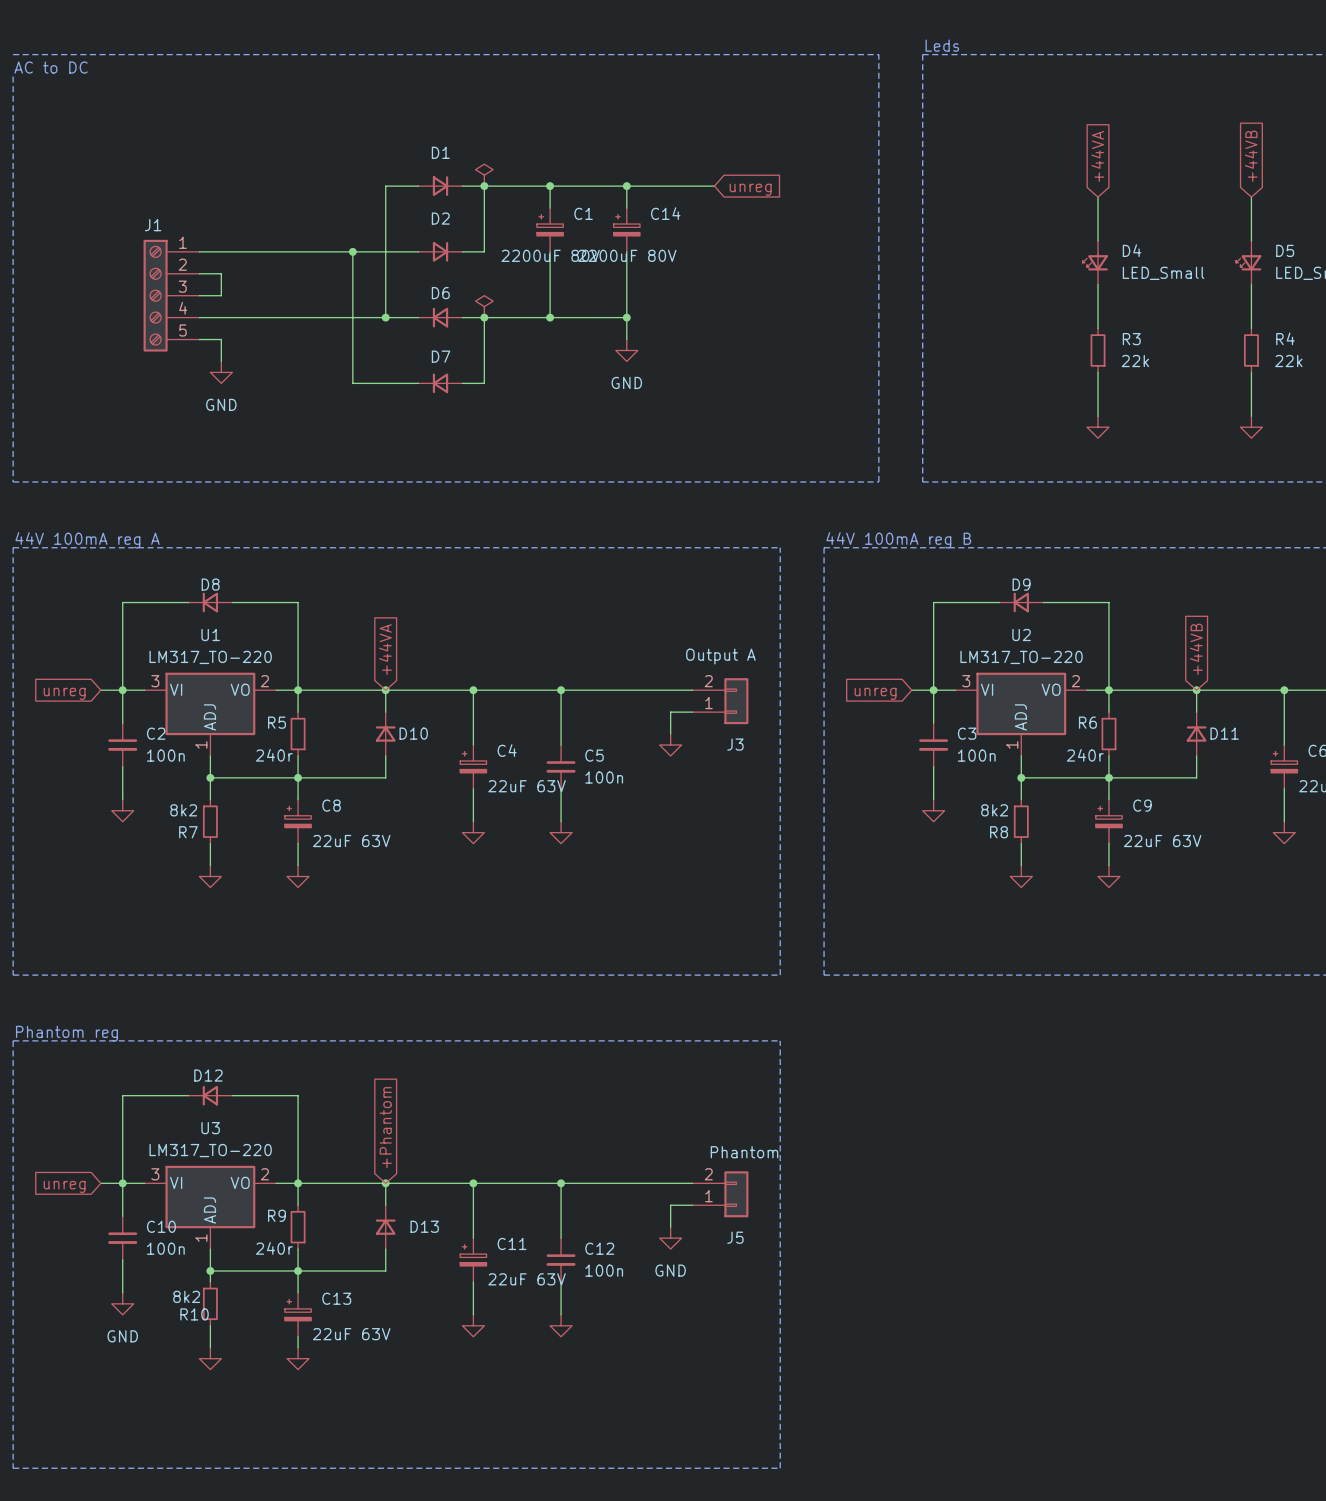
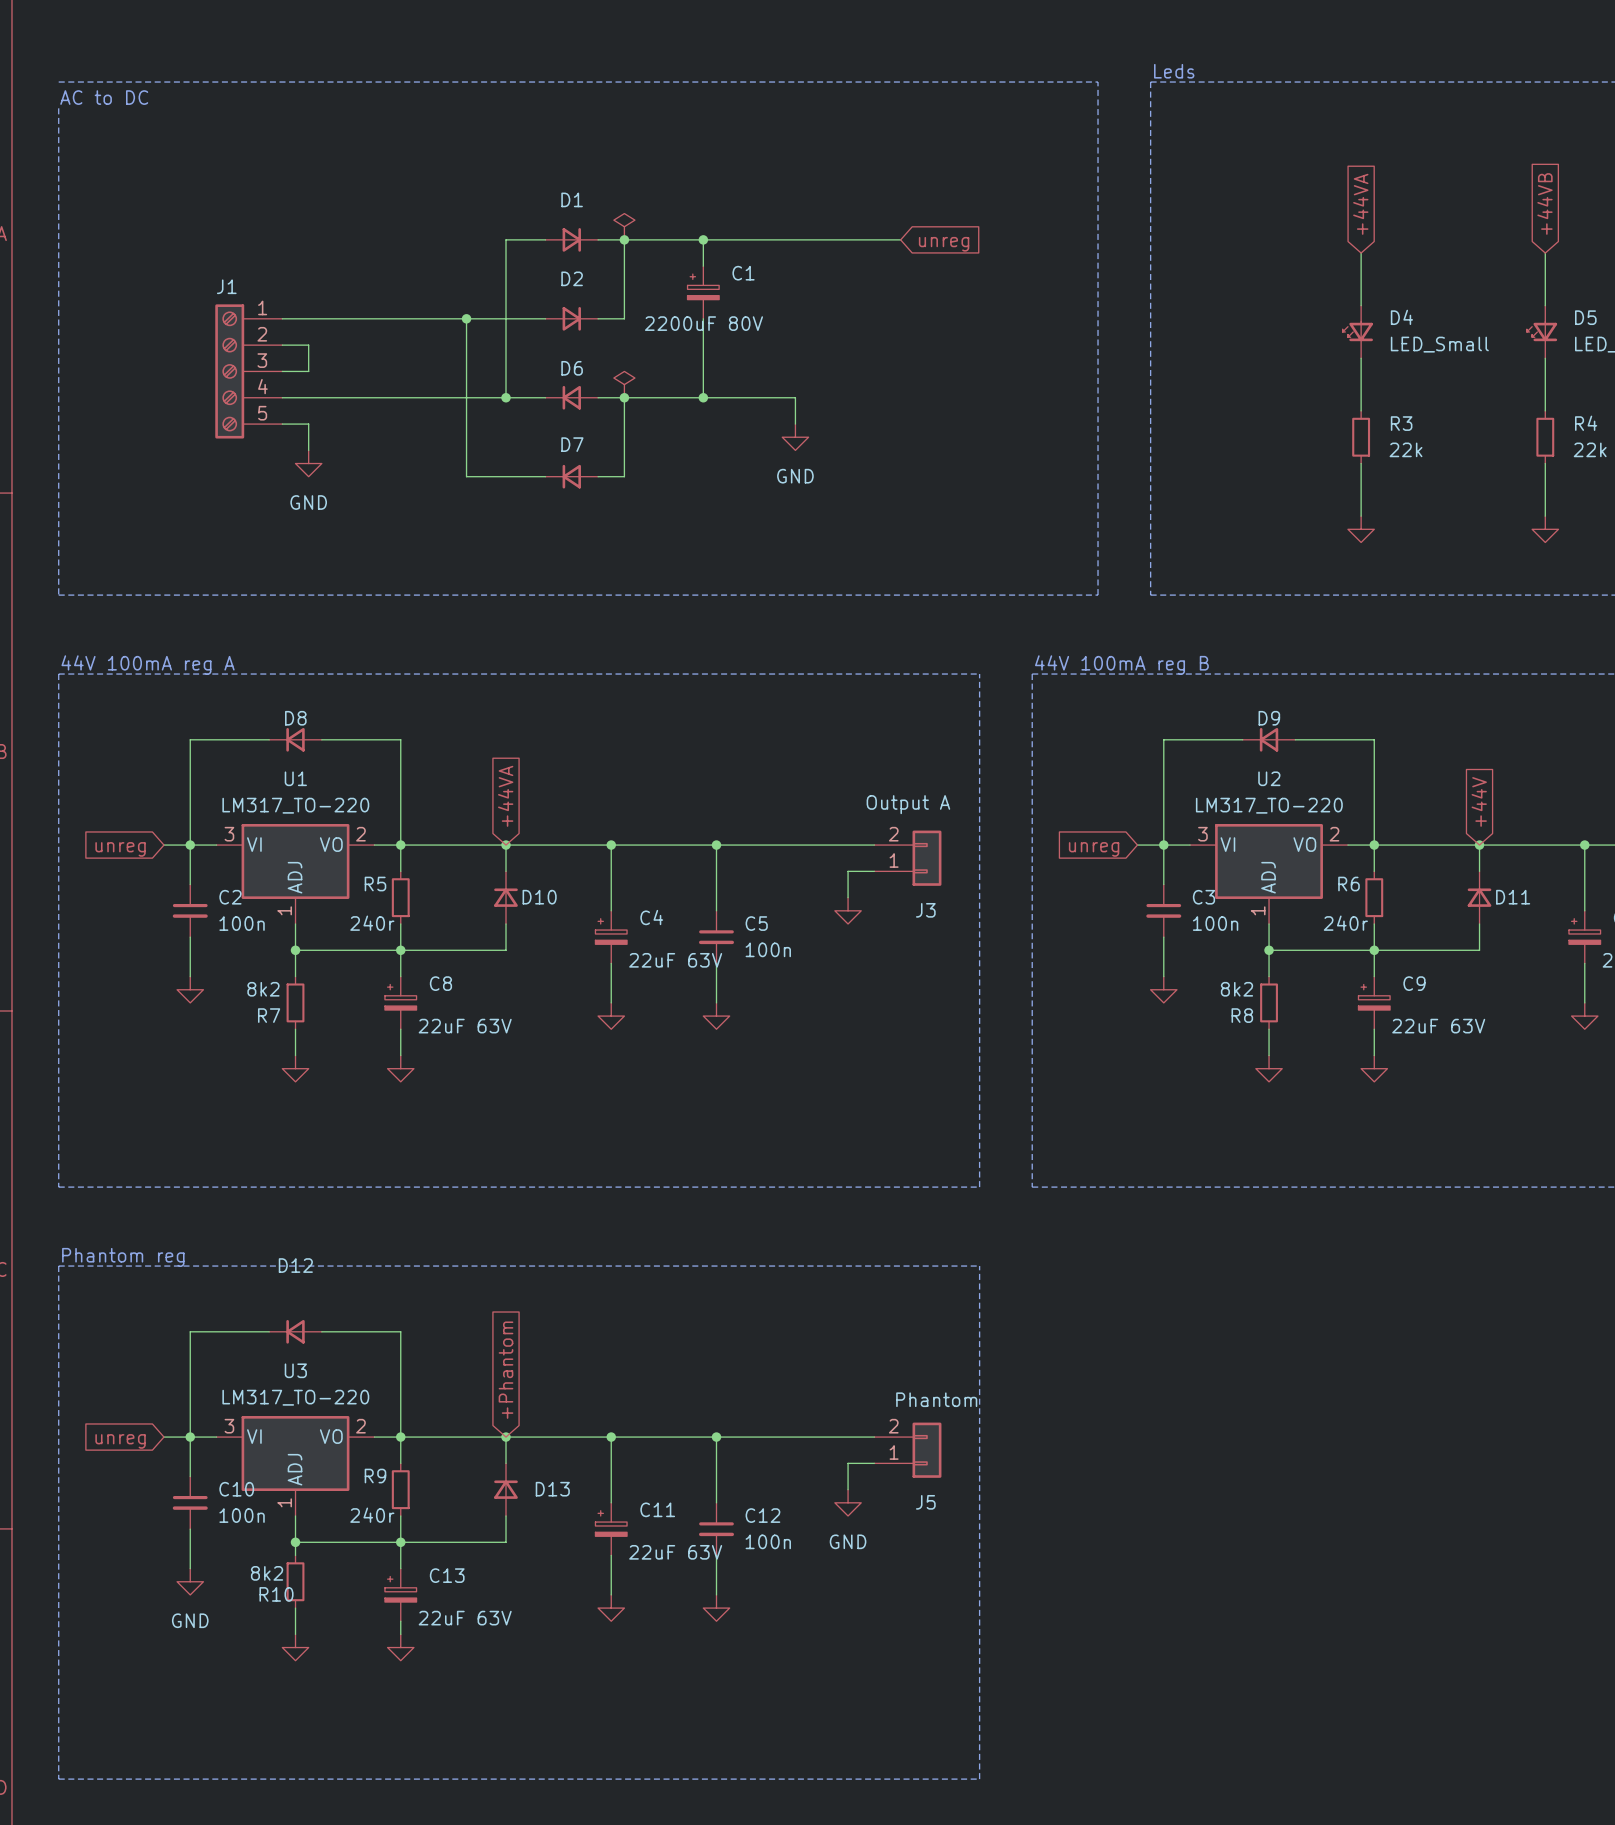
wire: (626, 186) (626, 208) -> none
junction: (626, 186) -> none
C14: 2200uF 80V (626, 229) -> none
wire: (626, 251) (626, 317) -> none
junction: (626, 317) -> none
global label: +44VB (1196, 649) -> +44V (1479, 801)
D12 name position: D12 (208, 1075) -> D12 (295, 1265)

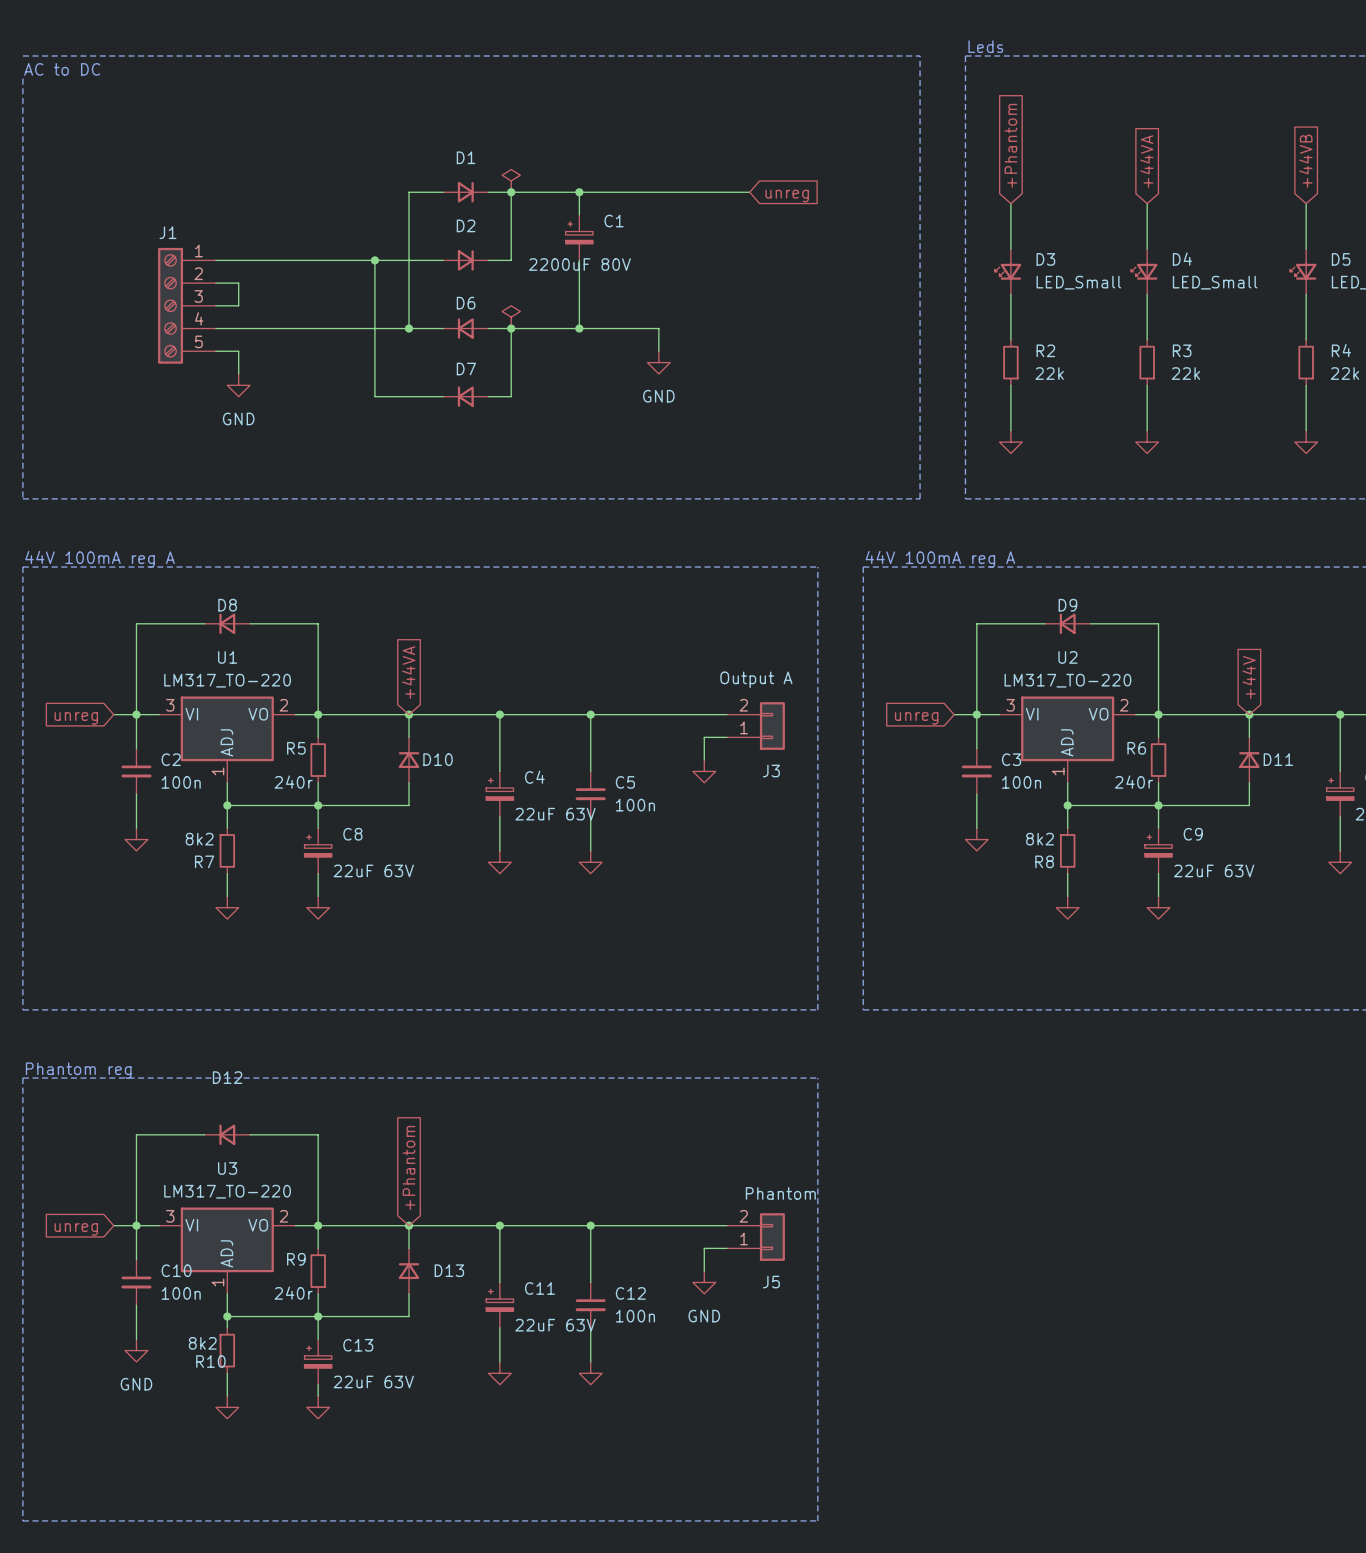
global label: none -> +Phantom (1010, 145)
wire: none -> (1010, 203) (1010, 249)
D3: none -> LED_Small (1008, 271)
wire: none -> (1010, 294) (1010, 339)
R2: none -> 22k (1010, 362)
wire: none -> (1010, 385) (1010, 430)
power symbol: none -> (1010, 442)
text: 44V 100mA reg B (1121, 665) -> 44V 100mA reg A (940, 559)

